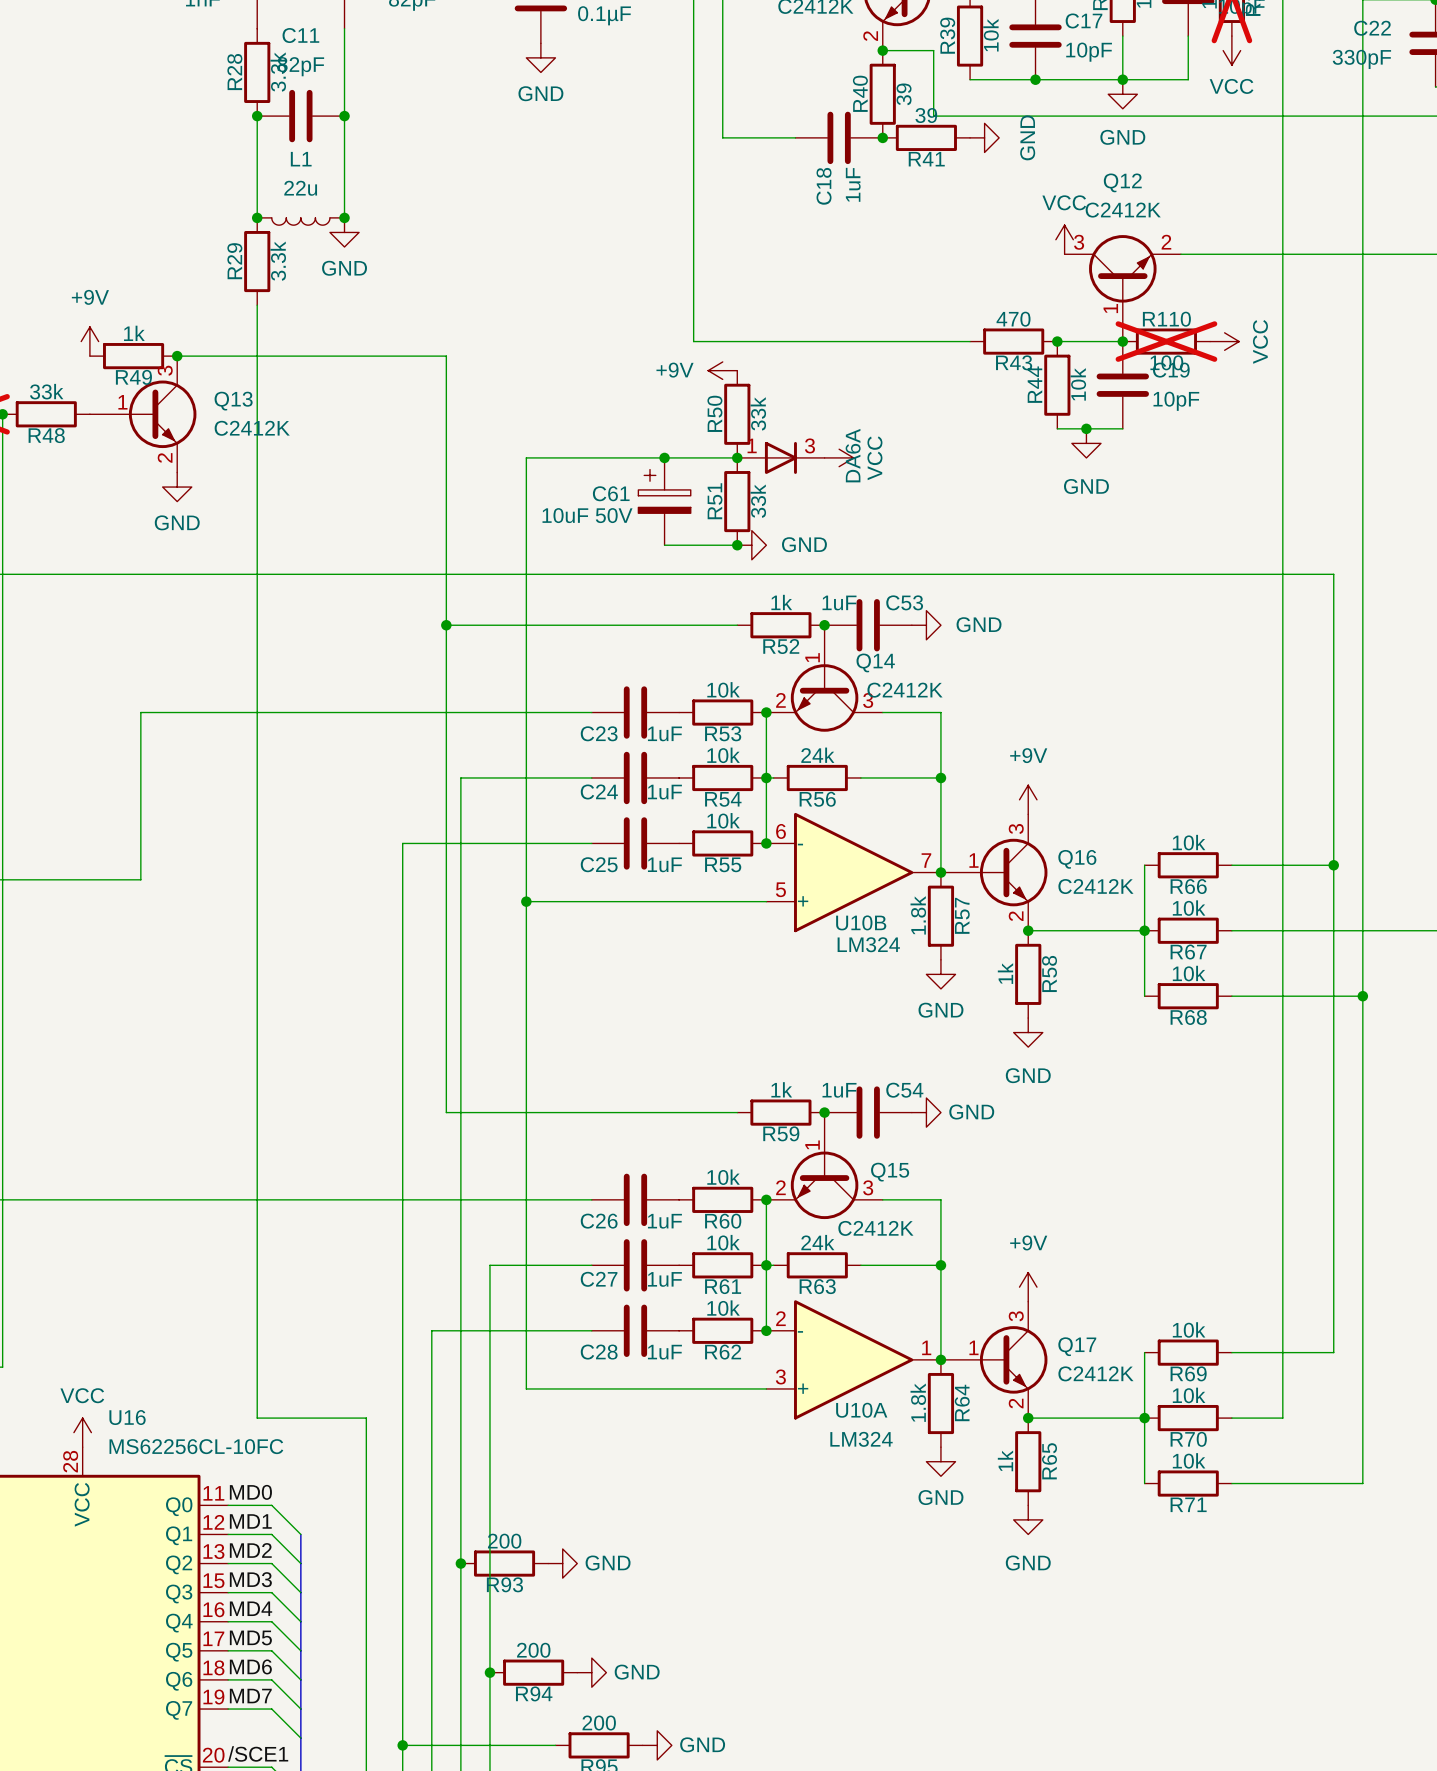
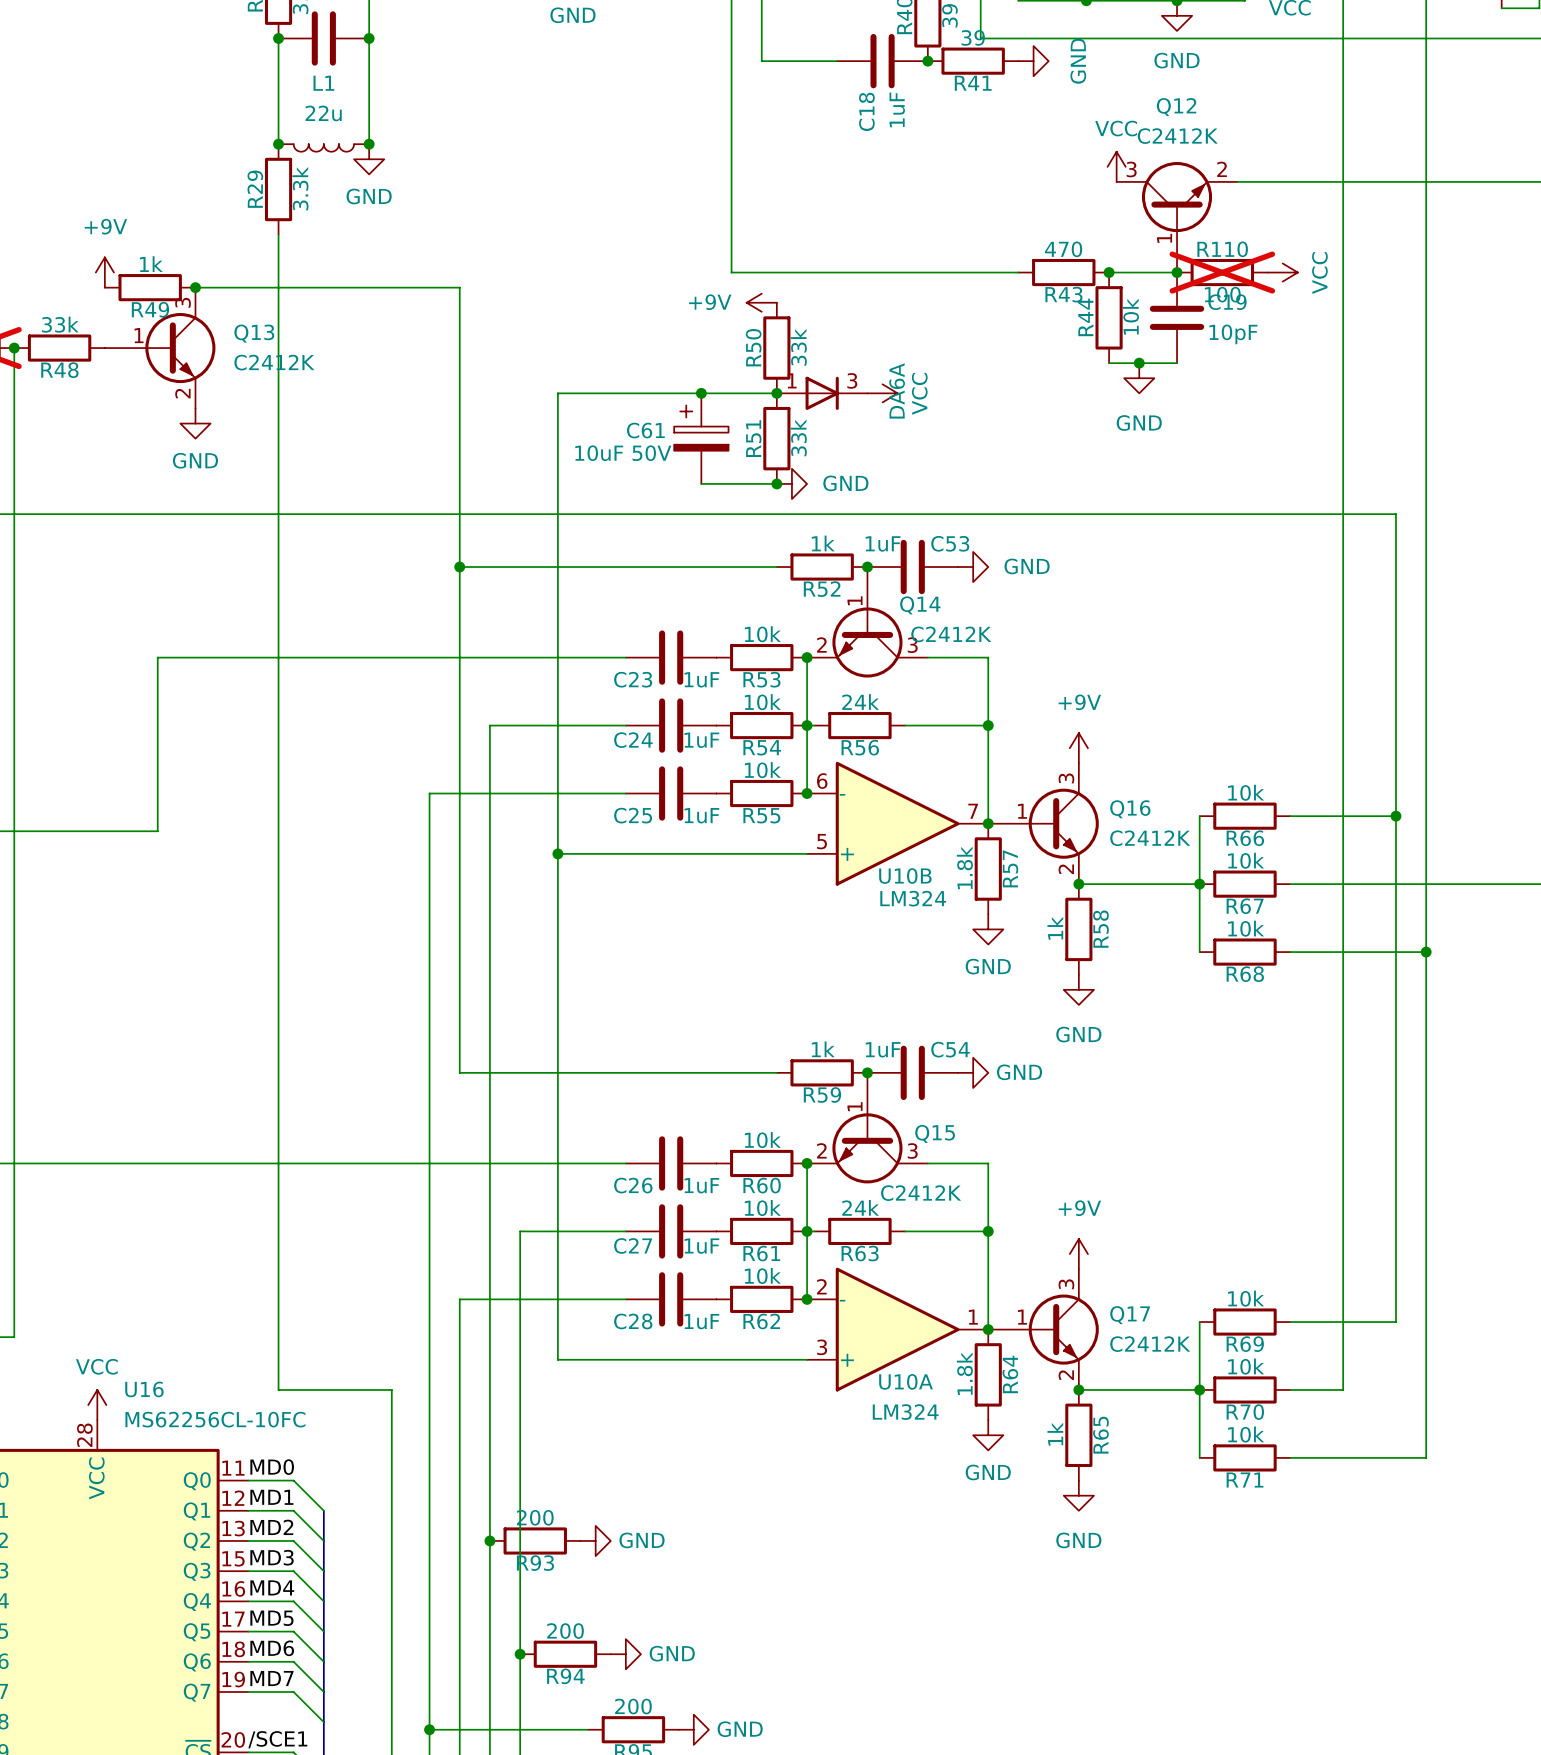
wire: (431, 356) (446, 356) (446, 1112) -> (459, 287) (459, 1072) (474, 1072)
wire: none -> (459, 567) (474, 567)
junction position: (446, 625) -> (459, 567)

